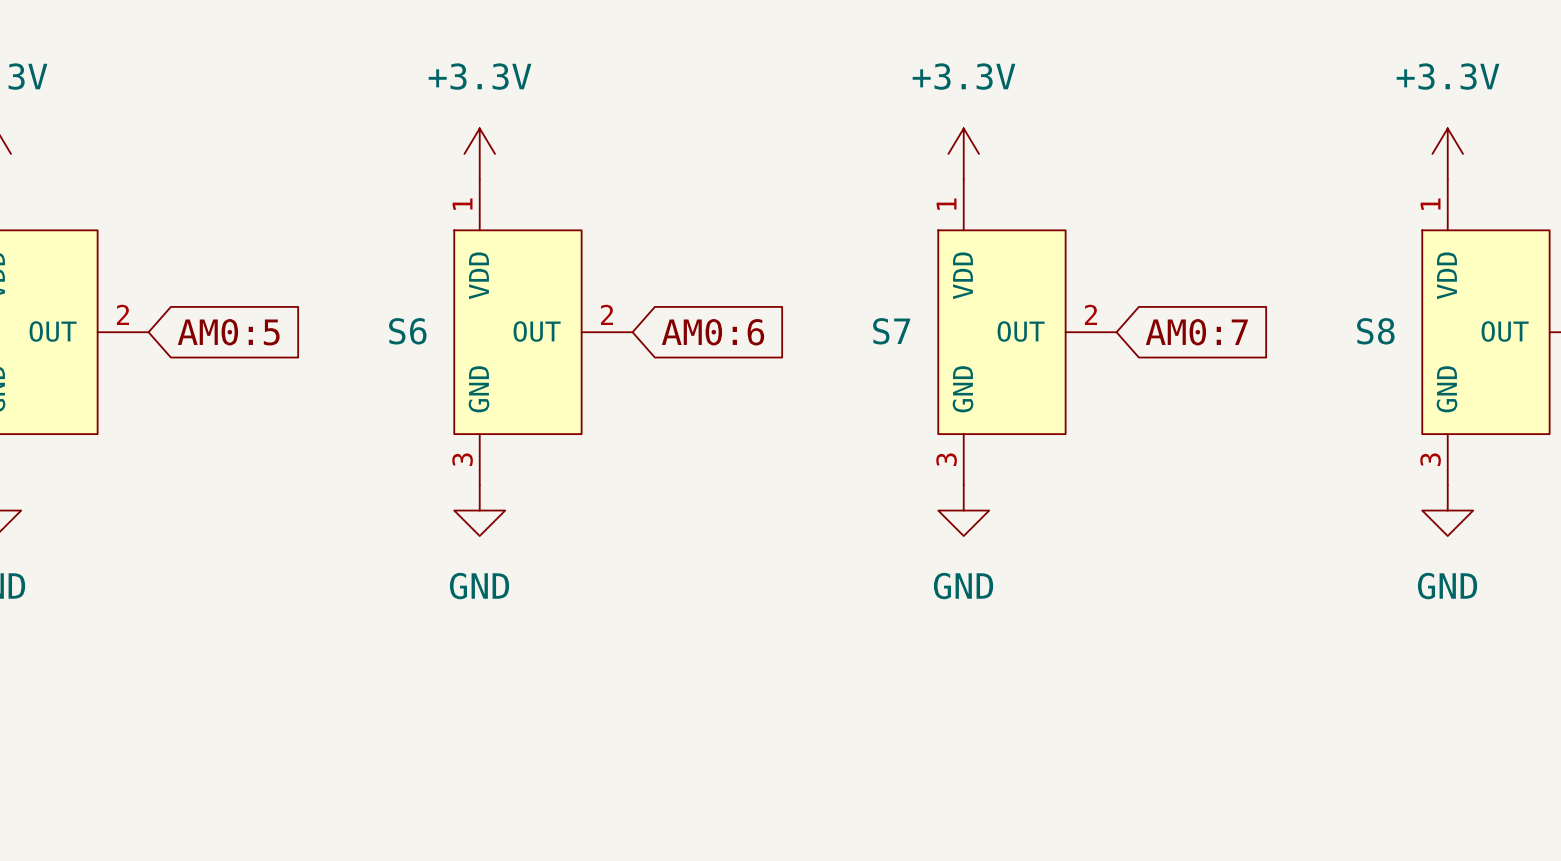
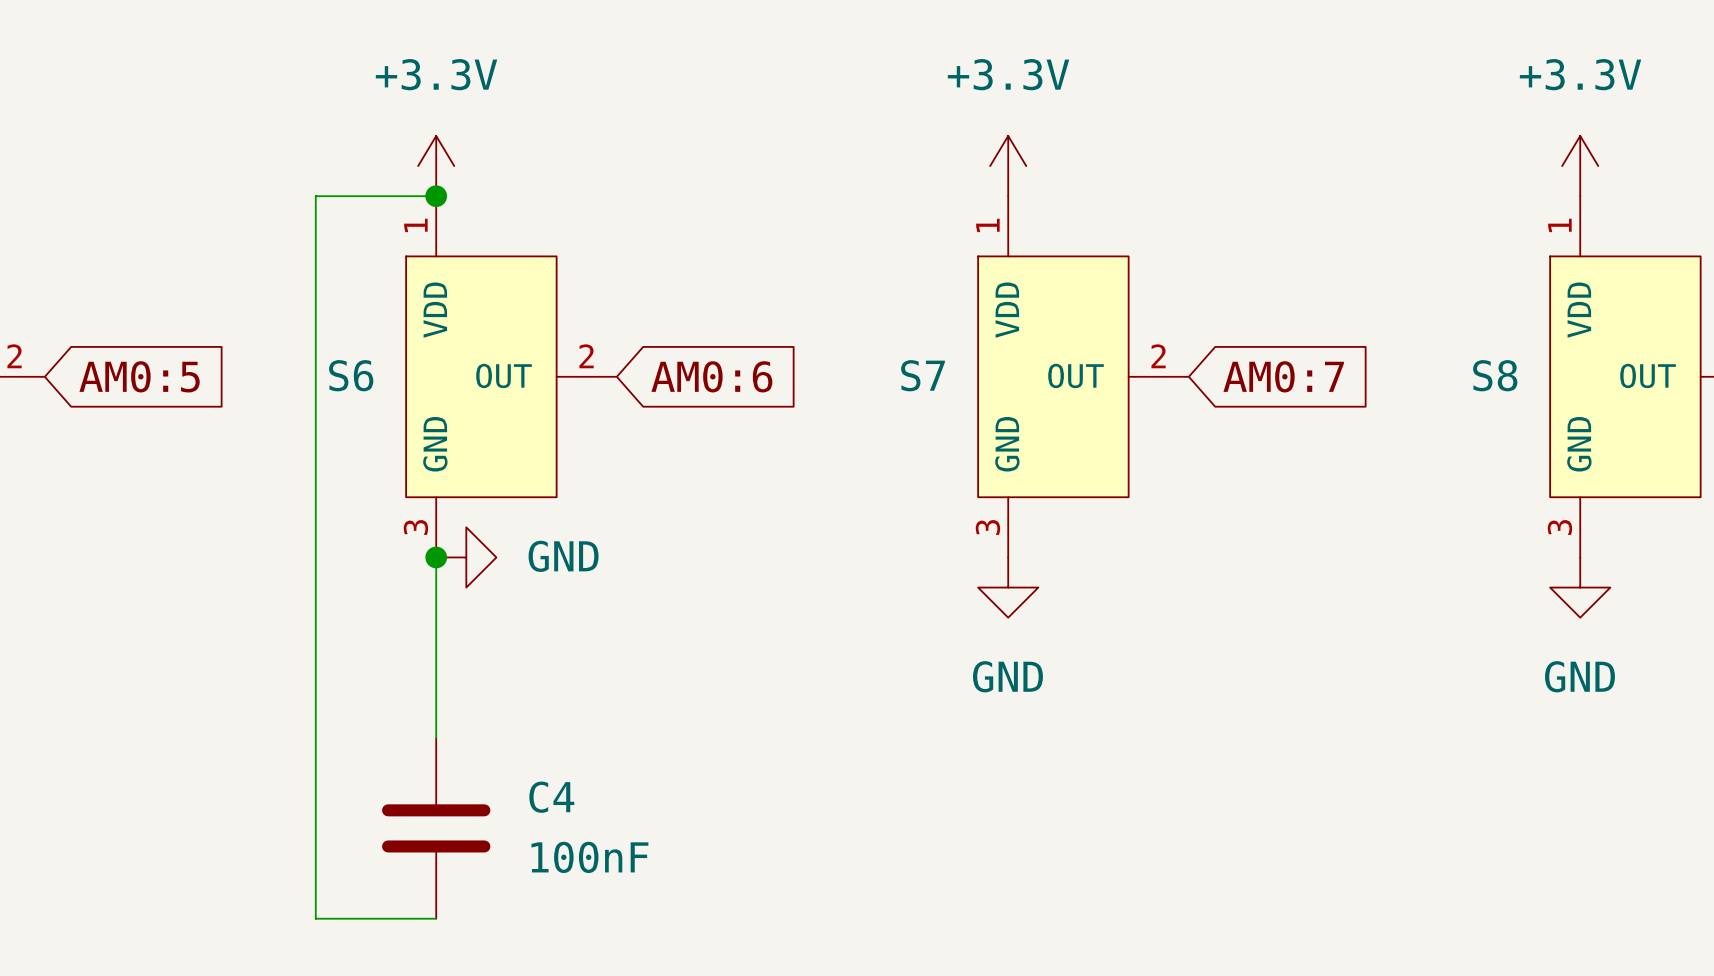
wire: none -> (436, 196) (315, 196) (315, 918) (436, 918)
junction: none -> (436, 196)
wire: none -> (436, 557) (436, 738)
junction: none -> (436, 557)
power symbol rotation: 0° (479, 510) -> 90° counterclockwise (466, 557)
power symbol position: GND (479, 510) -> GND (466, 557)
C4: none -> 100nF (436, 828)

